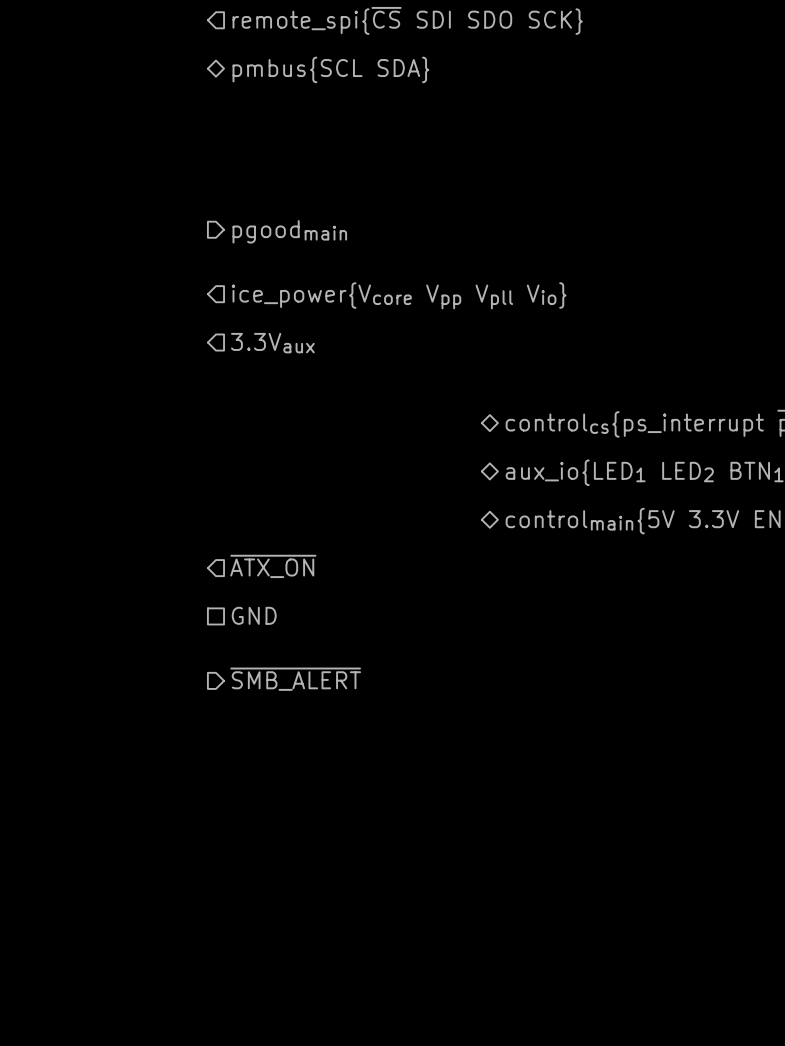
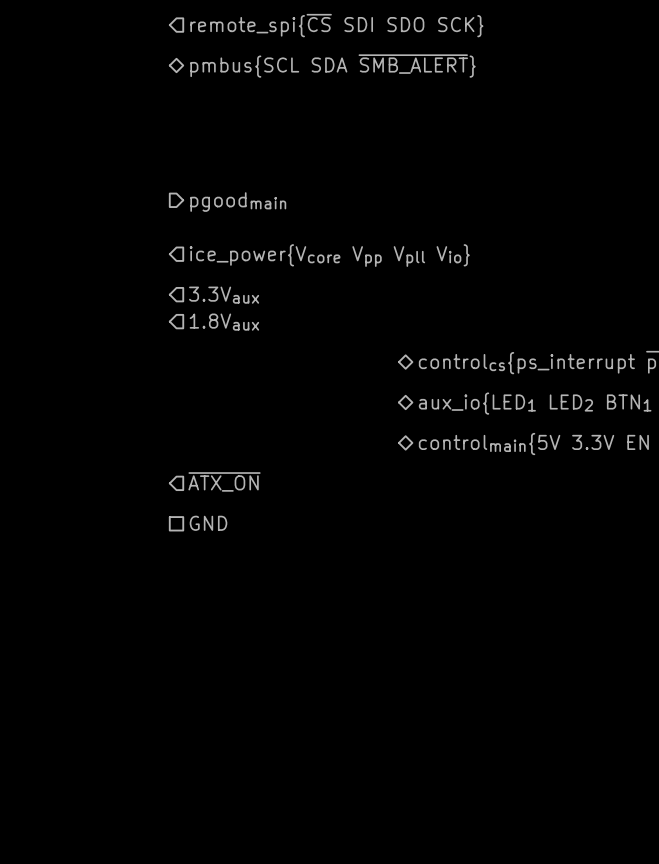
hierarchical label: pmbus{SCL SDA} (330, 69) -> pmbus{SCL SDA ~{SMB_ALERT}} (333, 66)
hierarchical label: none -> 1.8Vaux (224, 322)
hierarchical label: ~{SMB_ALERT} (295, 679) -> none

